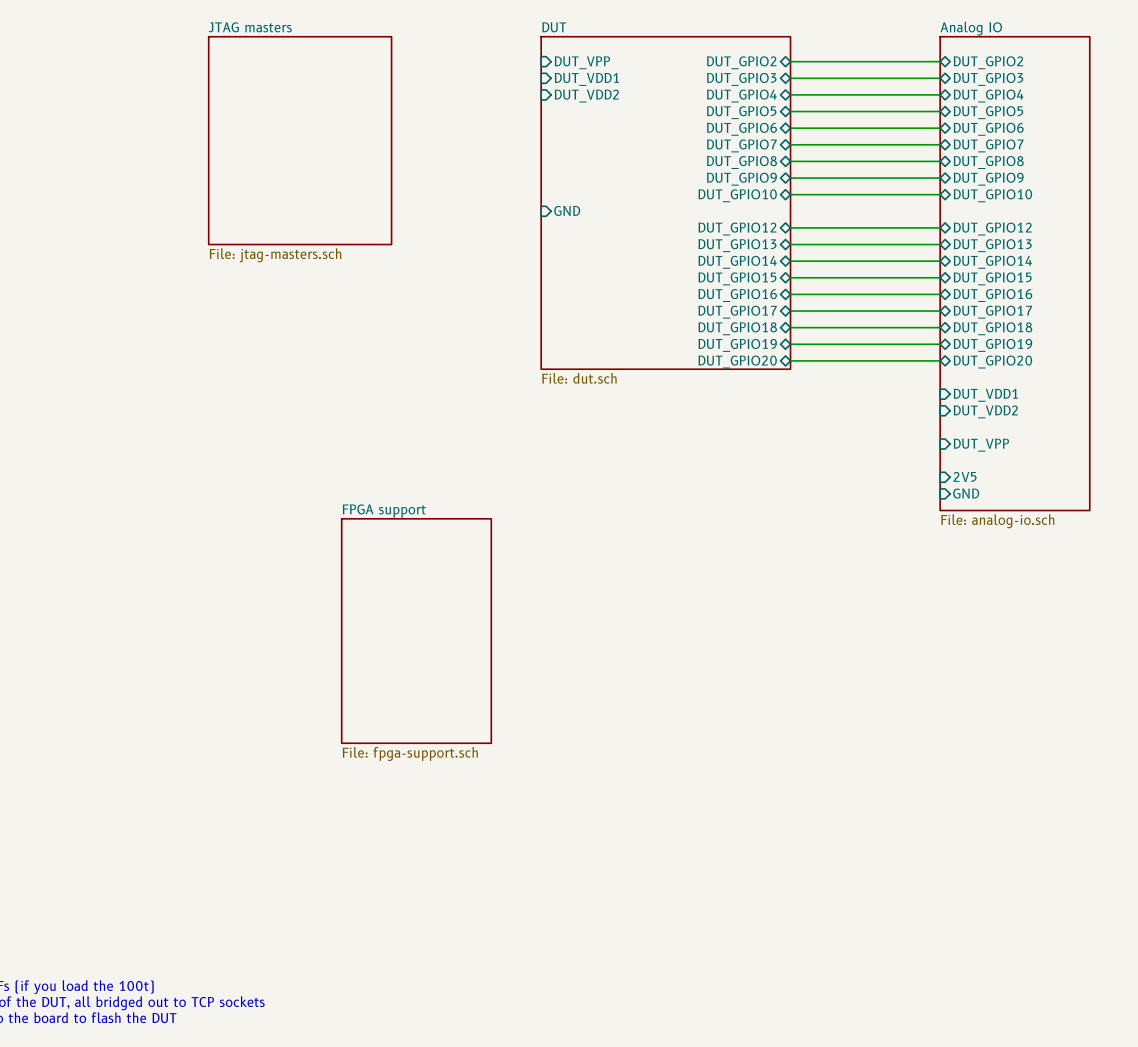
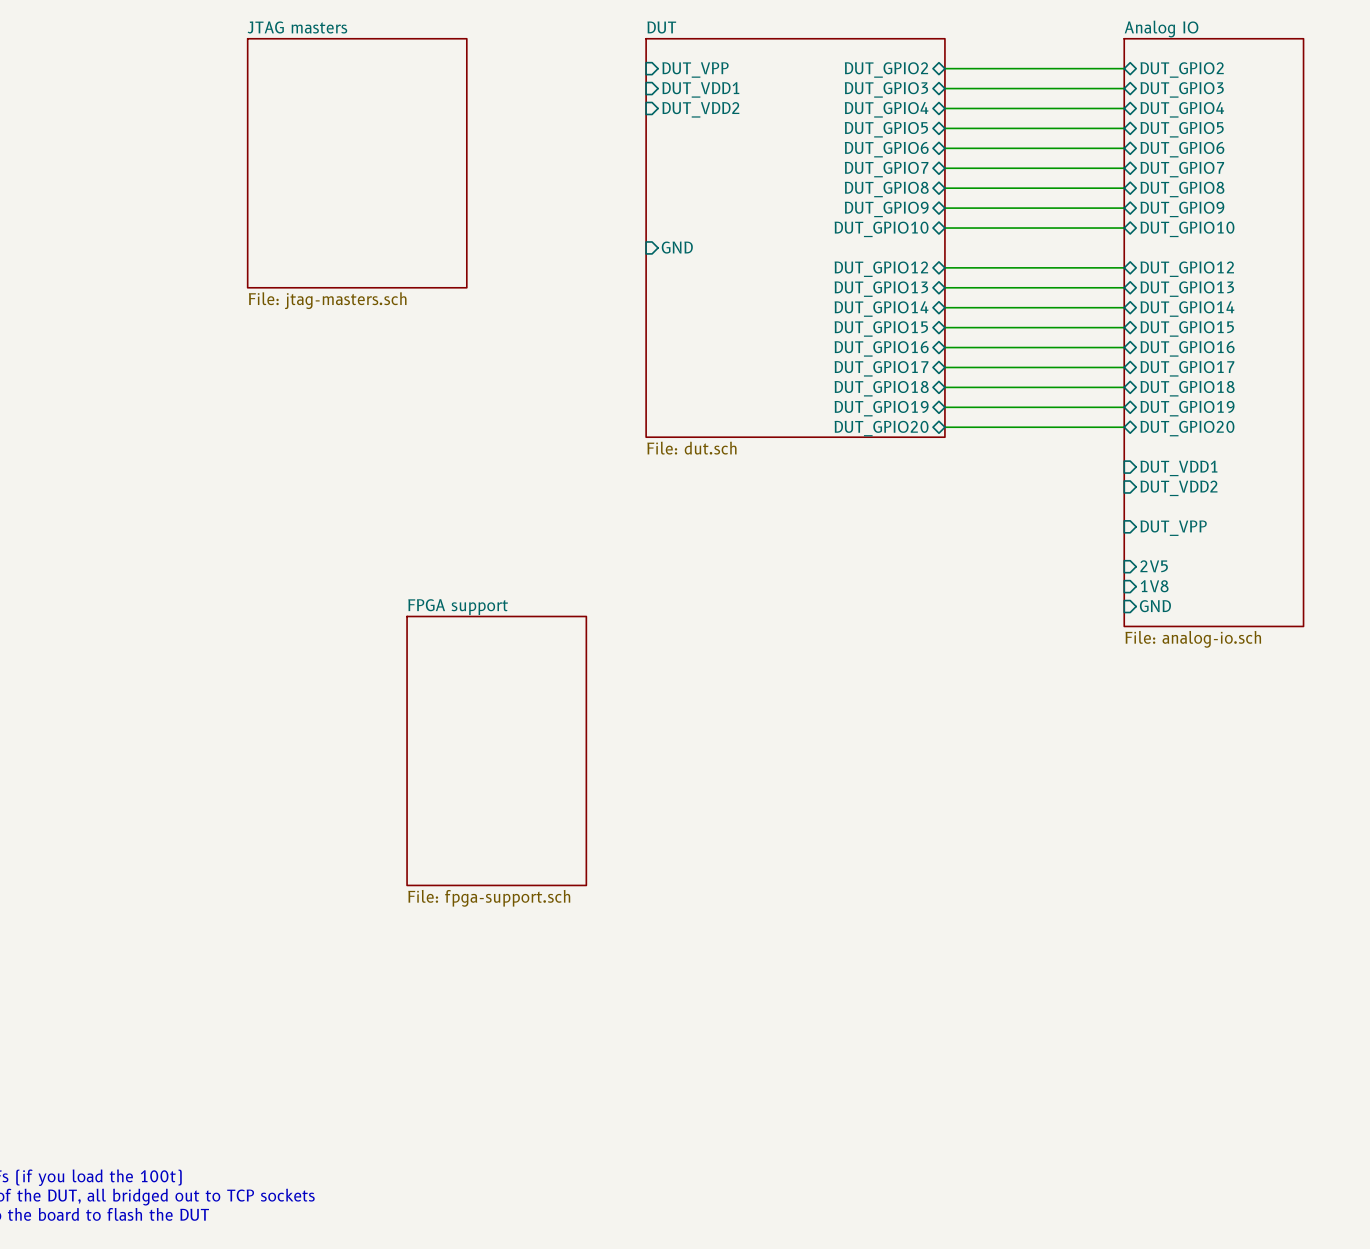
sheet Analog IO: File: analog-io.sch (1014, 273) -> none
sheet Analog IO: none -> File: analog-io.sch (1213, 332)
sheet pin: GND (966, 493) -> 1V8 (1154, 586)
sheet pin: none -> GND (1155, 606)

